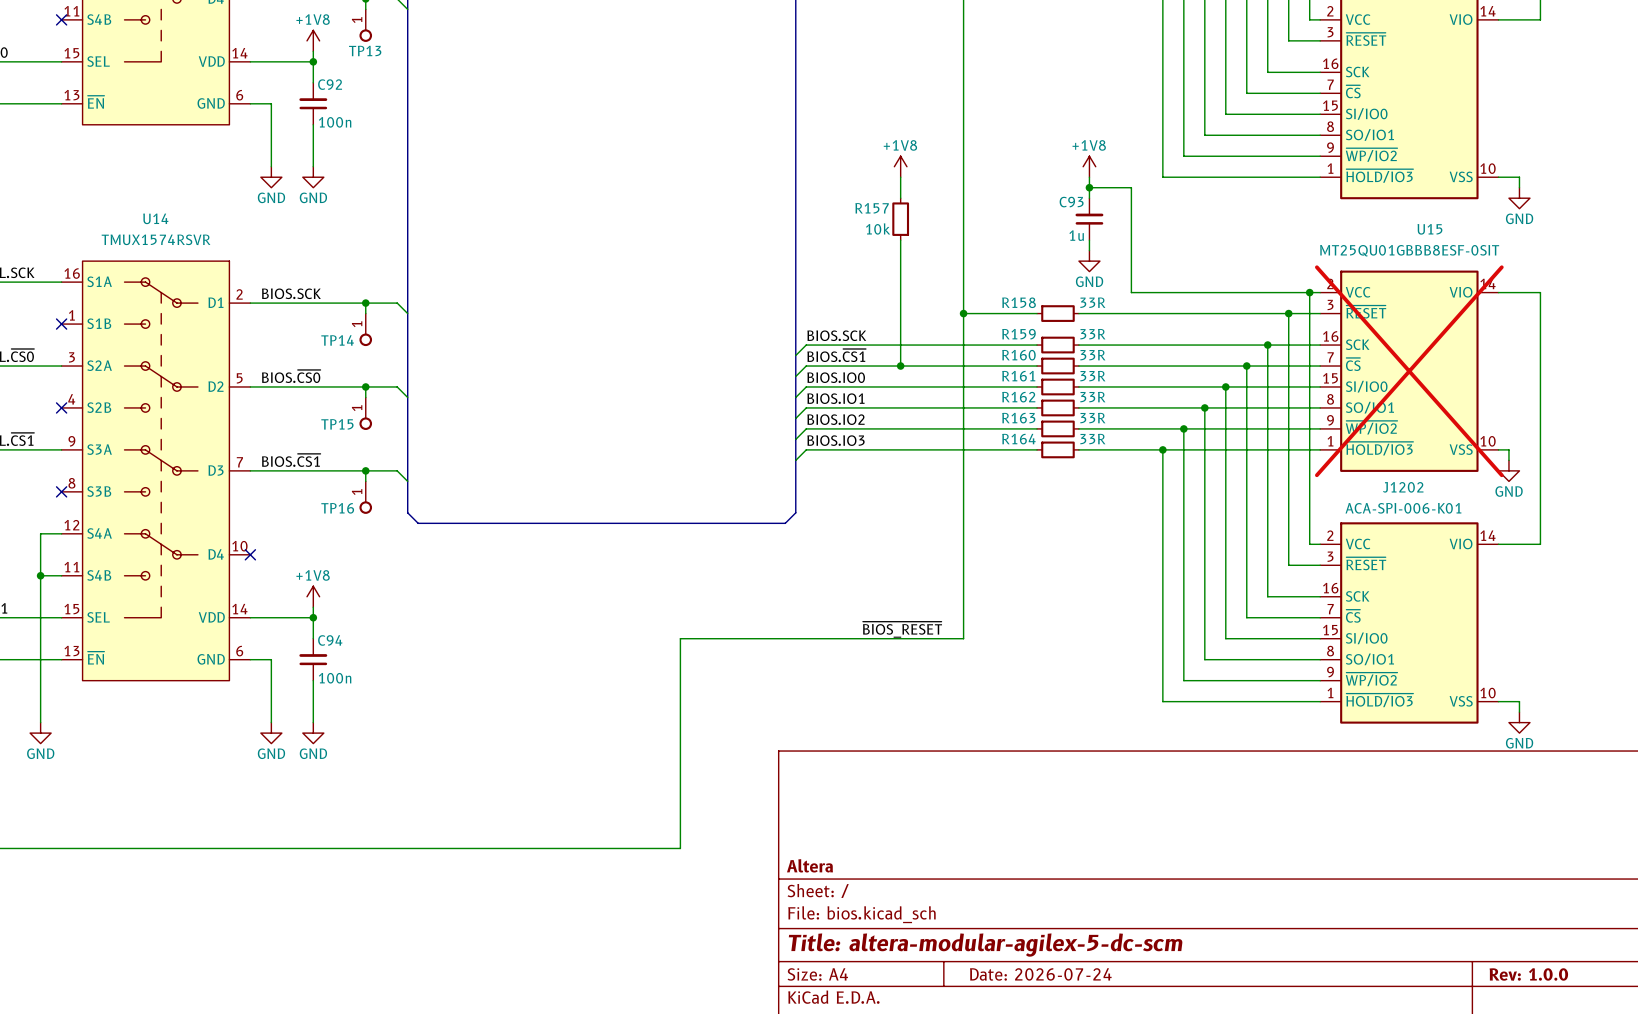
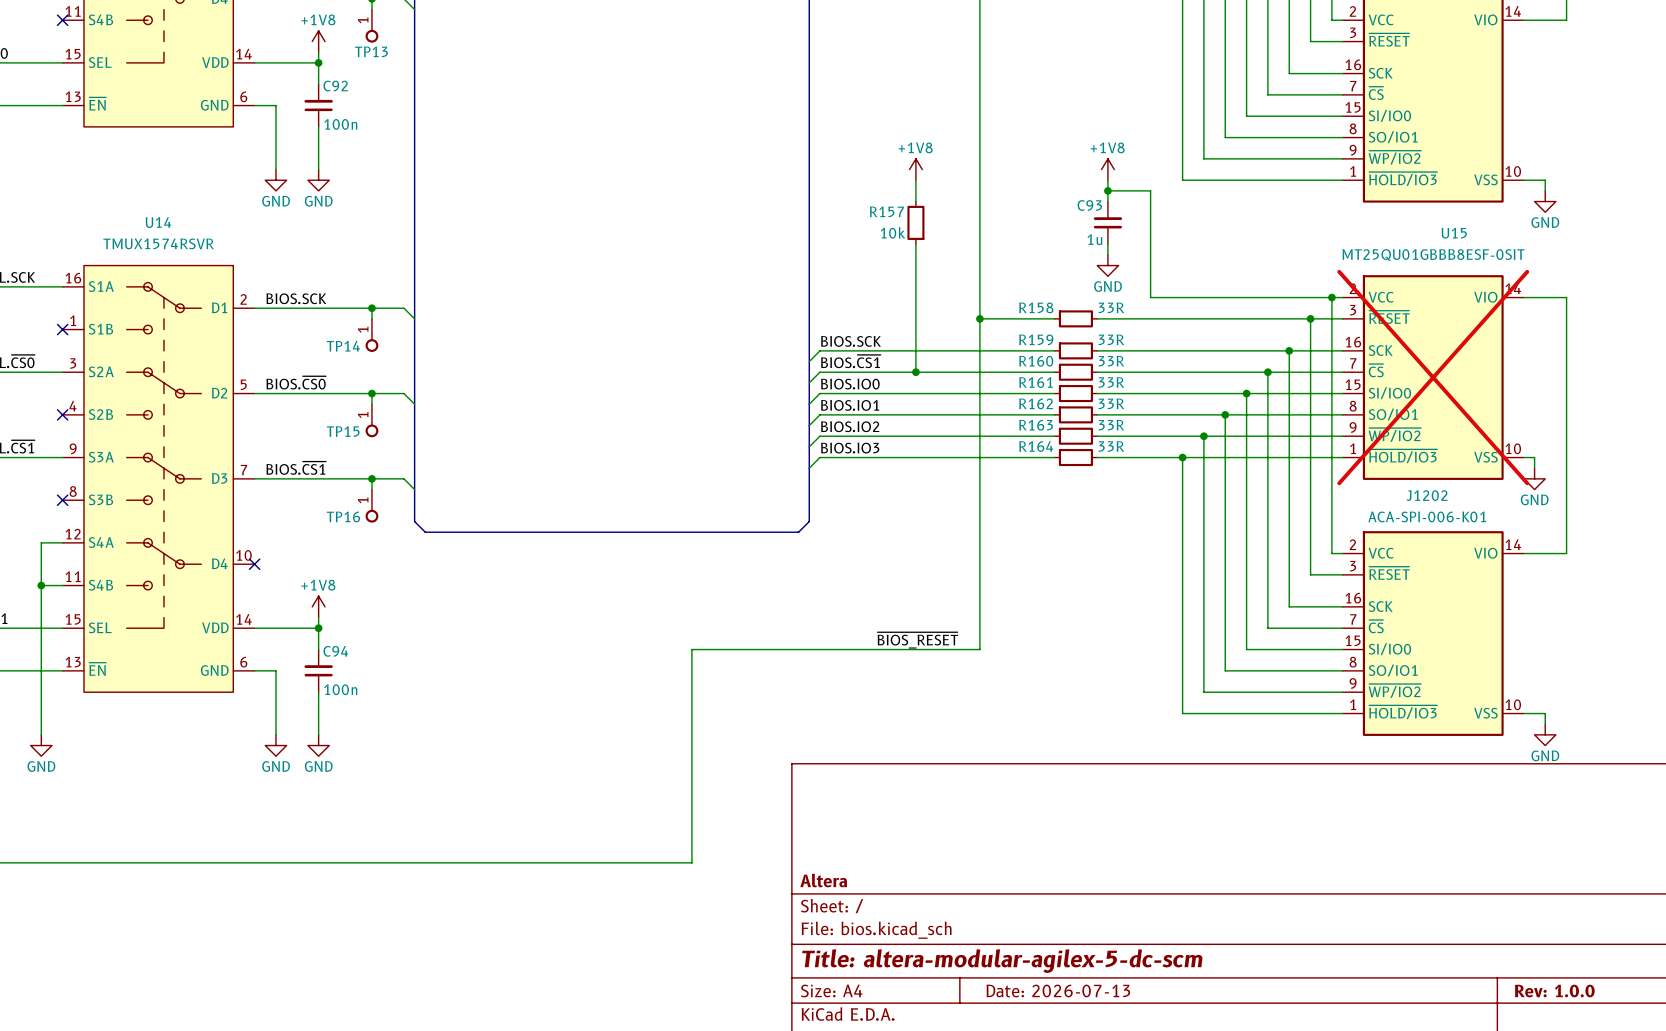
title block: Date: 2026-07-24 (1040, 974) -> Date: 2026-07-13 (1058, 990)

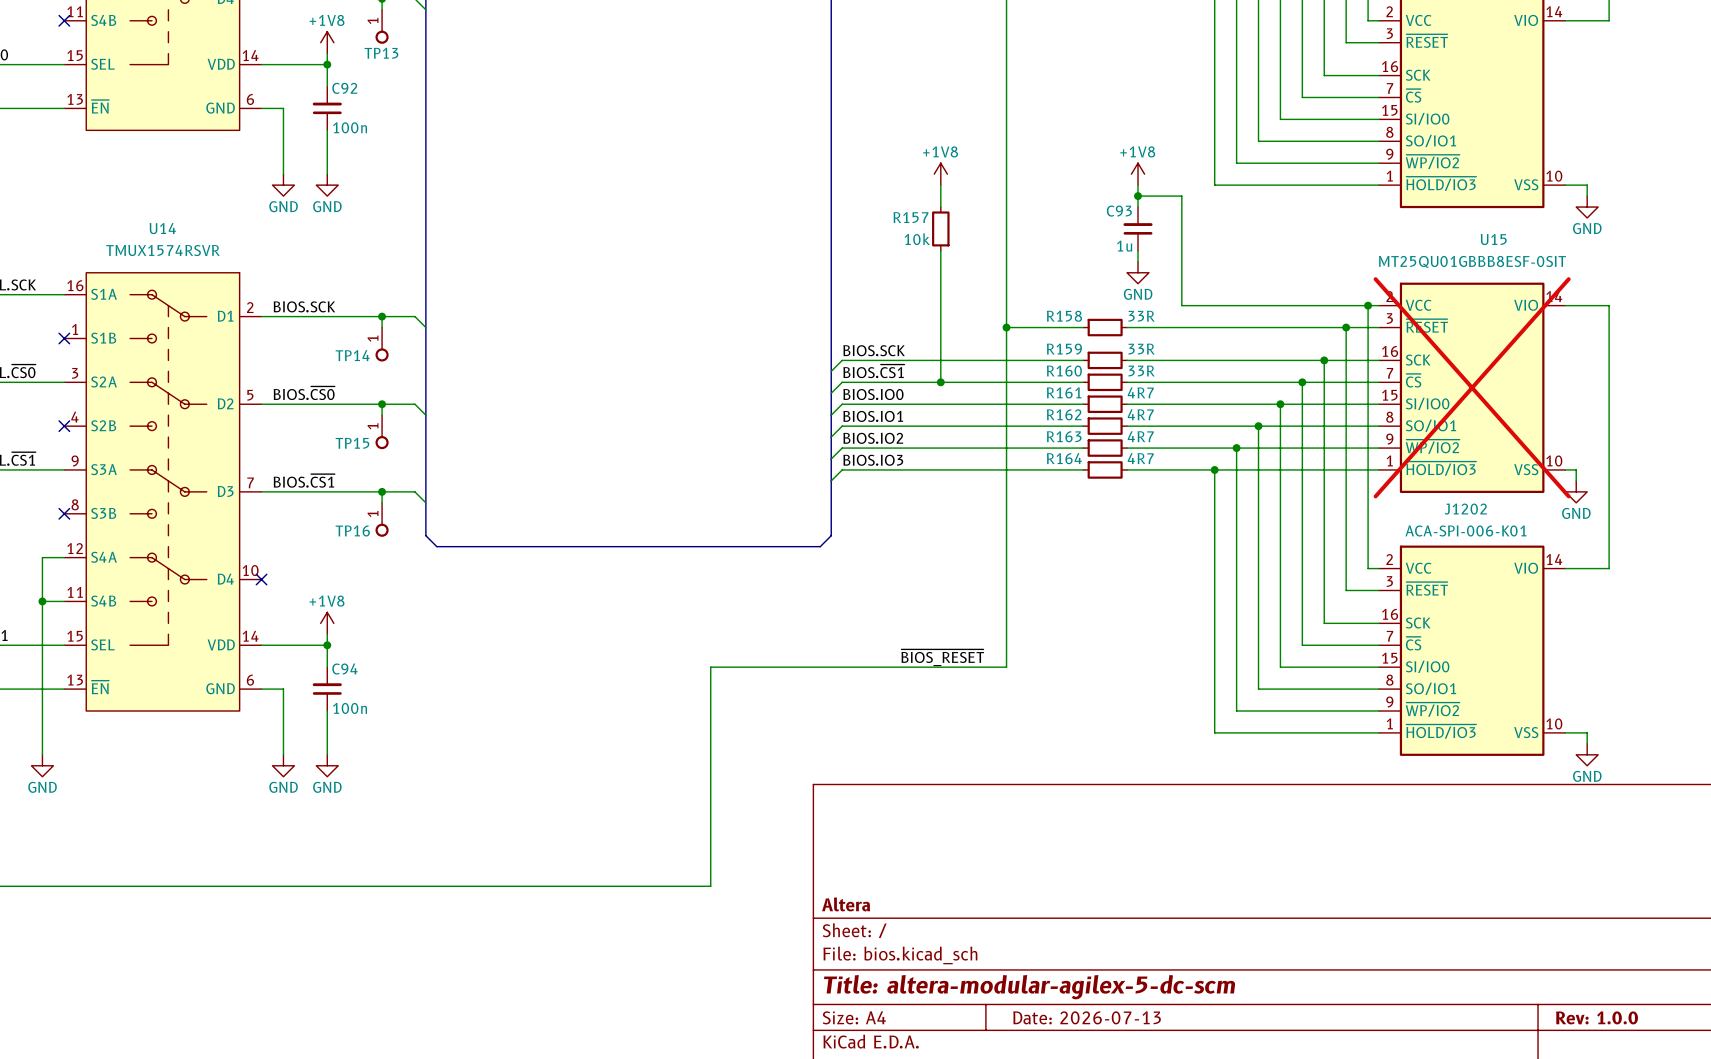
R161 text: 33R (1111, 382) -> 4R7 (1140, 392)
R162 text: 33R (1111, 403) -> 4R7 (1140, 414)
R163 text: 33R (1111, 425) -> 4R7 (1140, 436)
R164 text: 33R (1111, 446) -> 4R7 (1140, 458)

